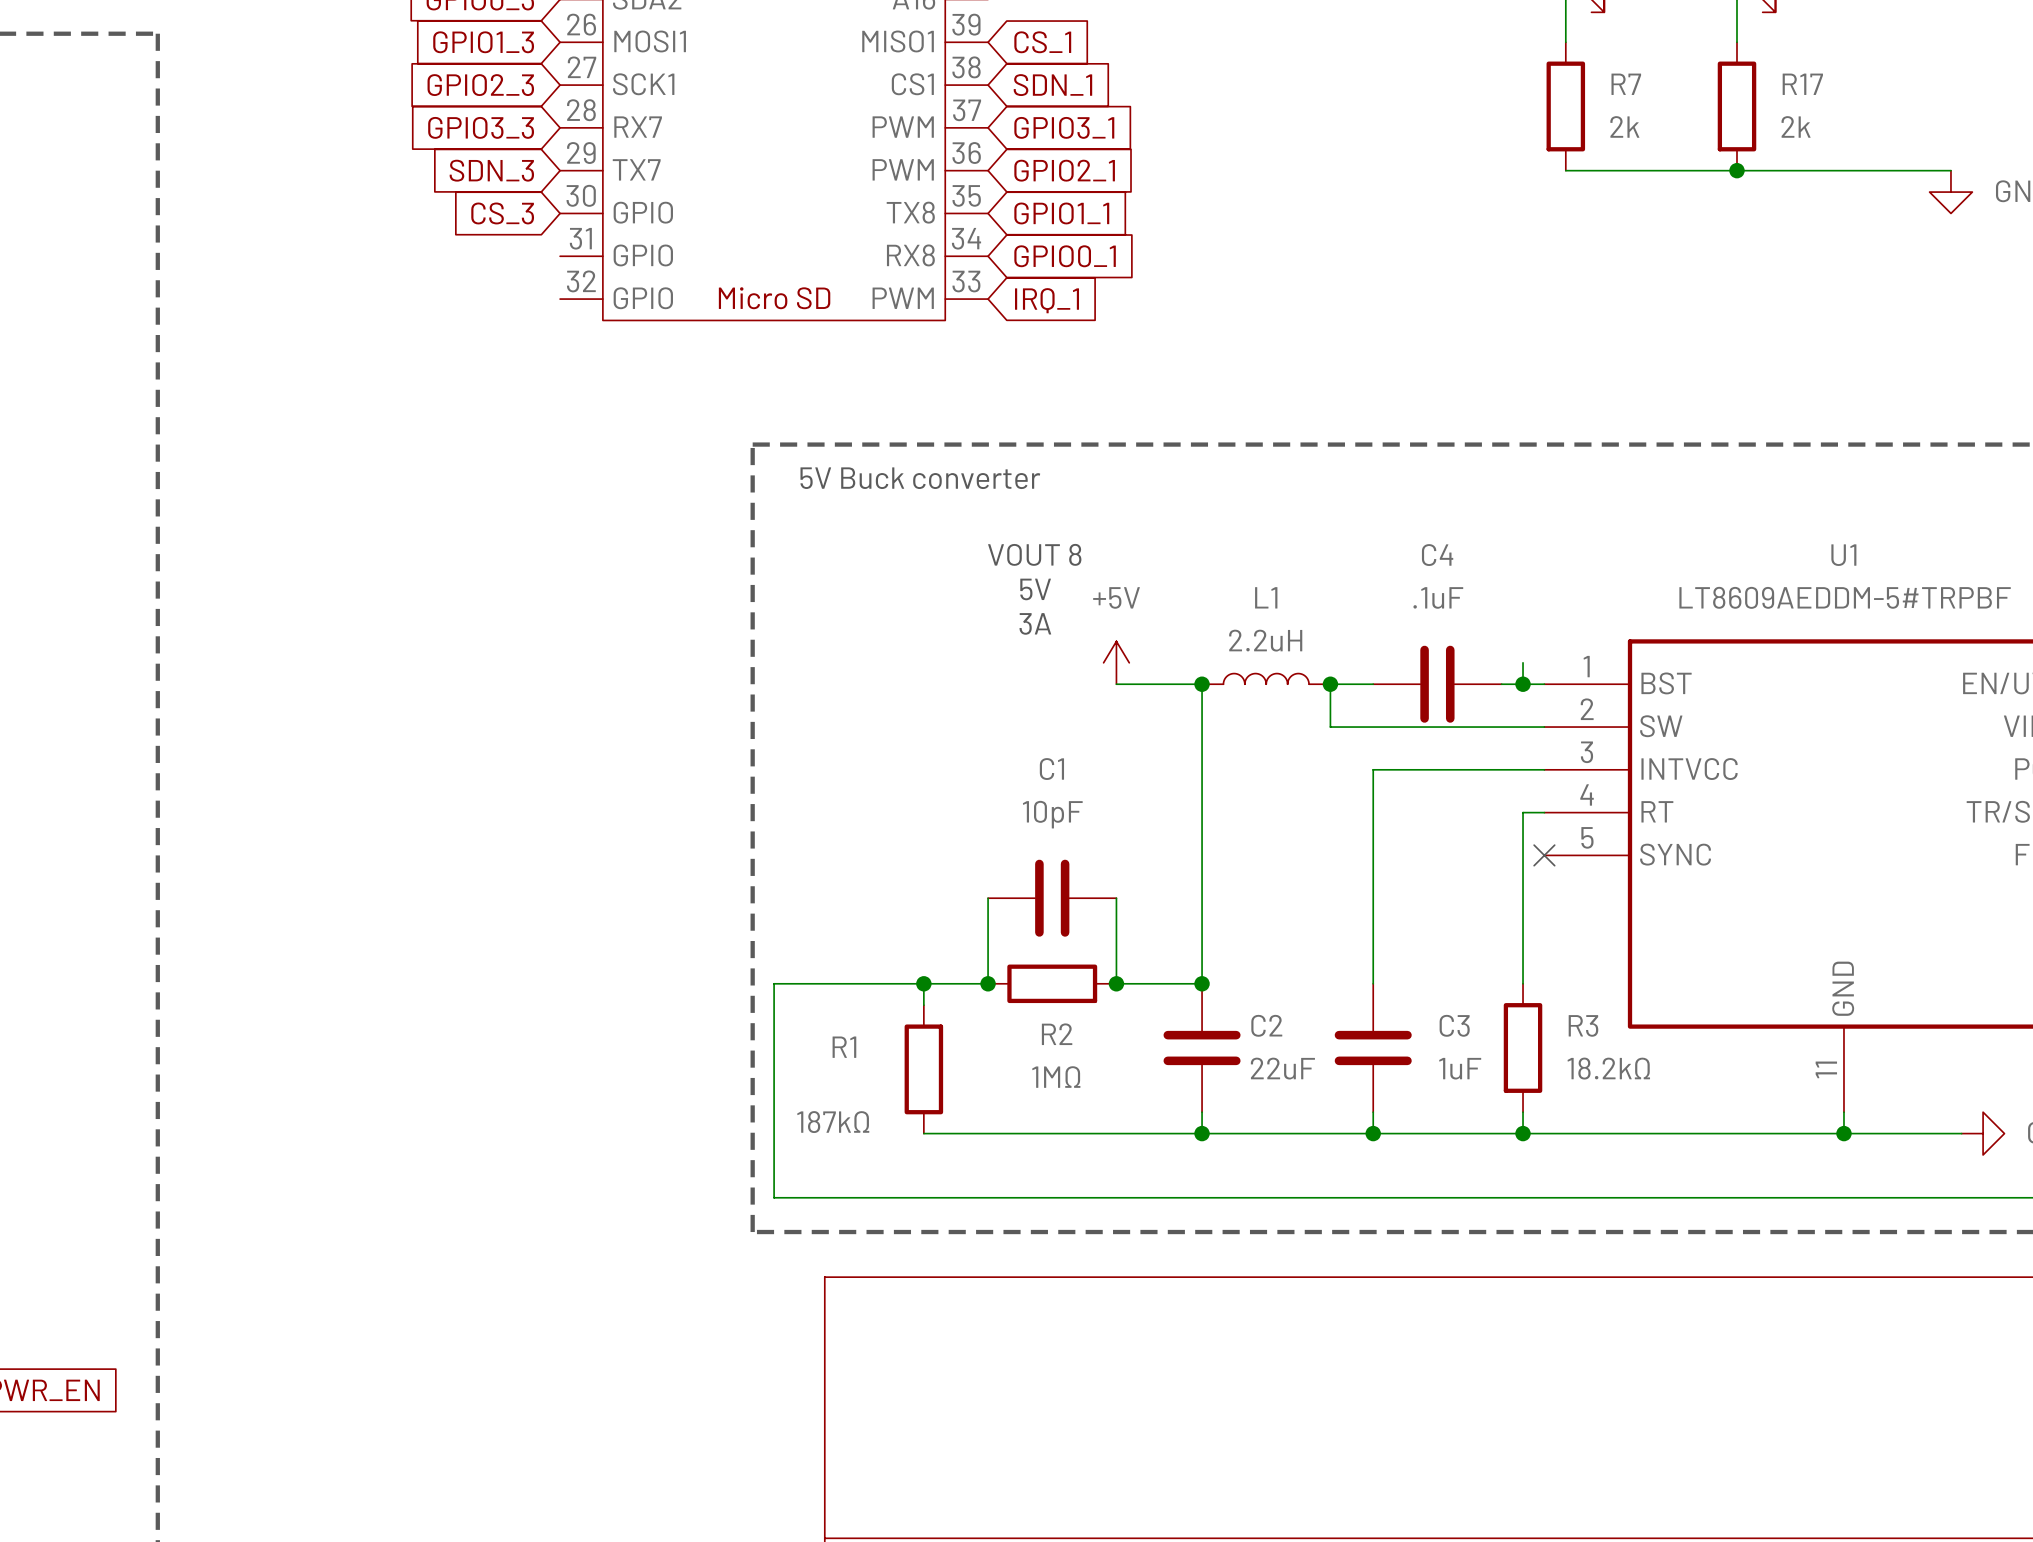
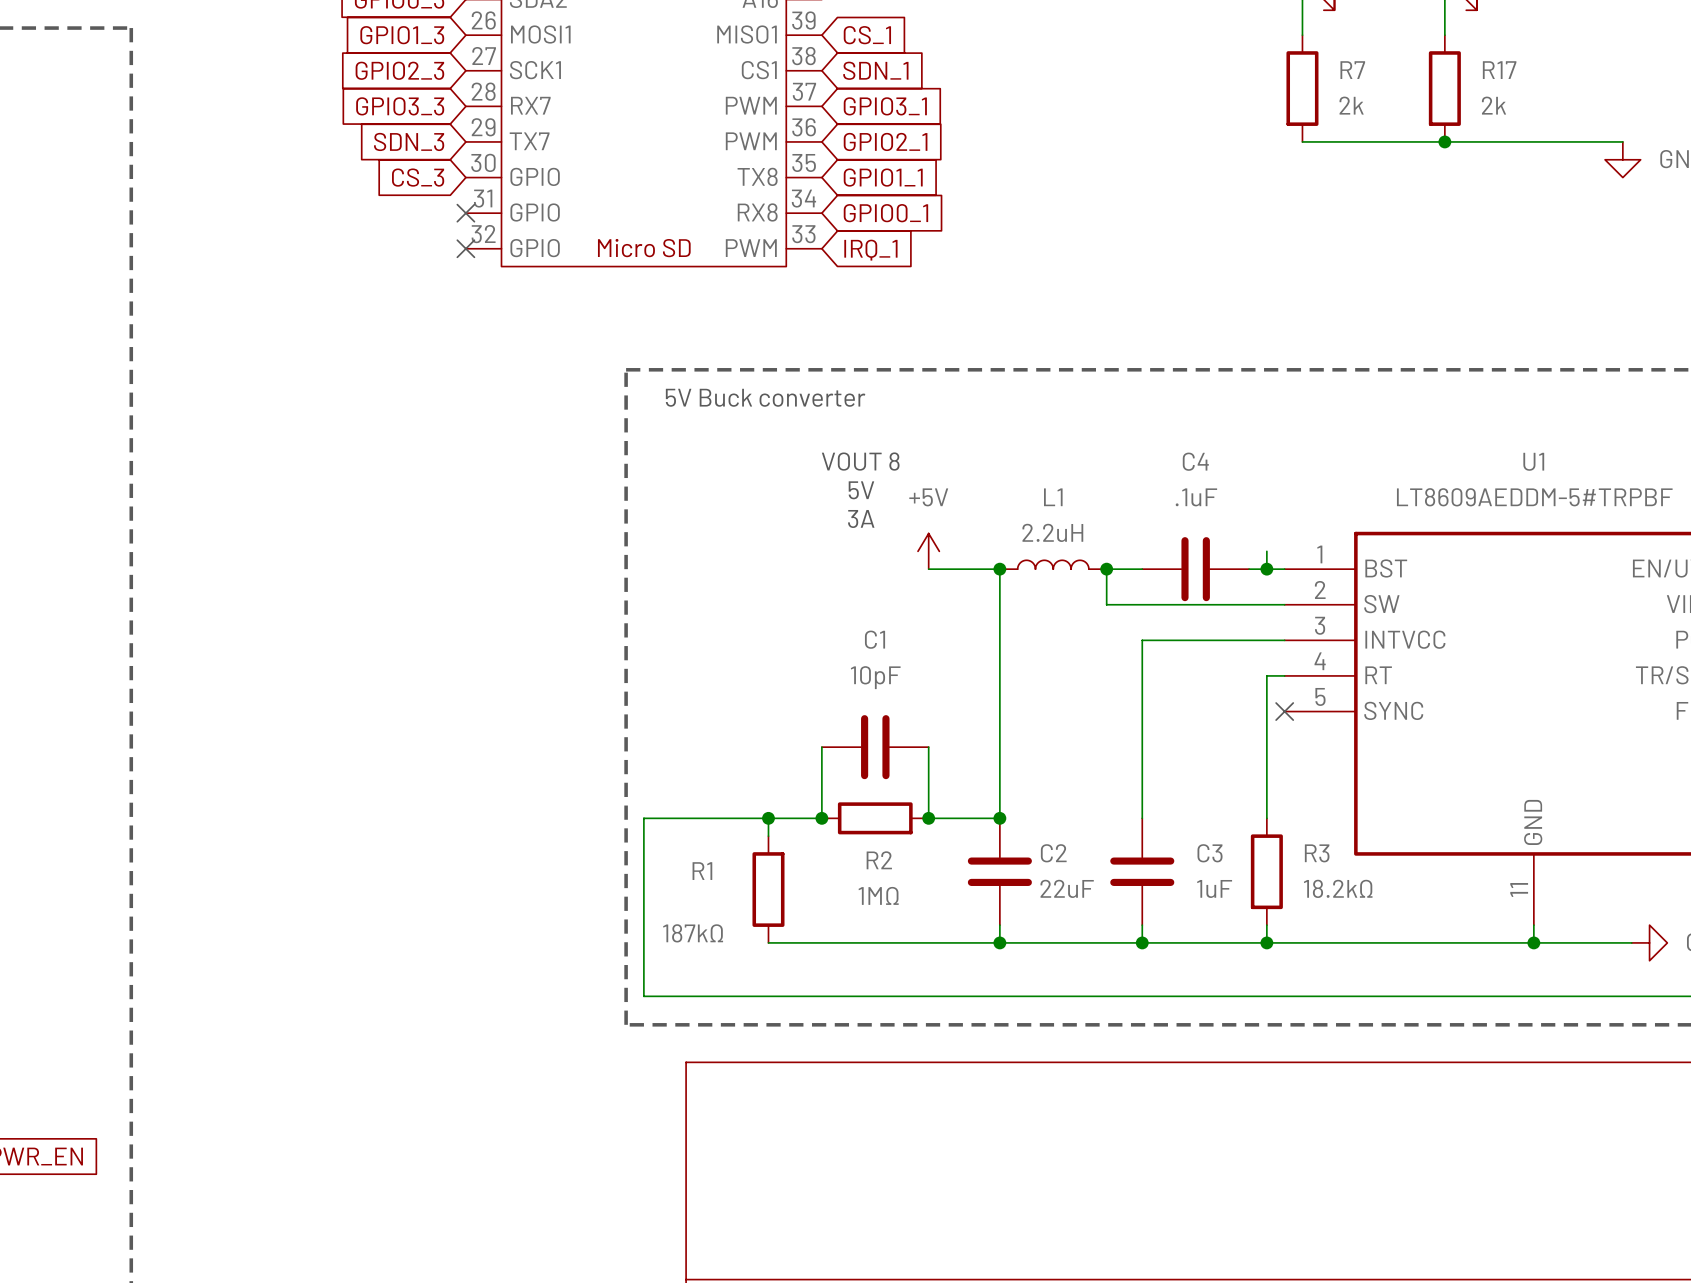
no-connect mark: none -> (465, 213)
no-connect mark: none -> (465, 248)

